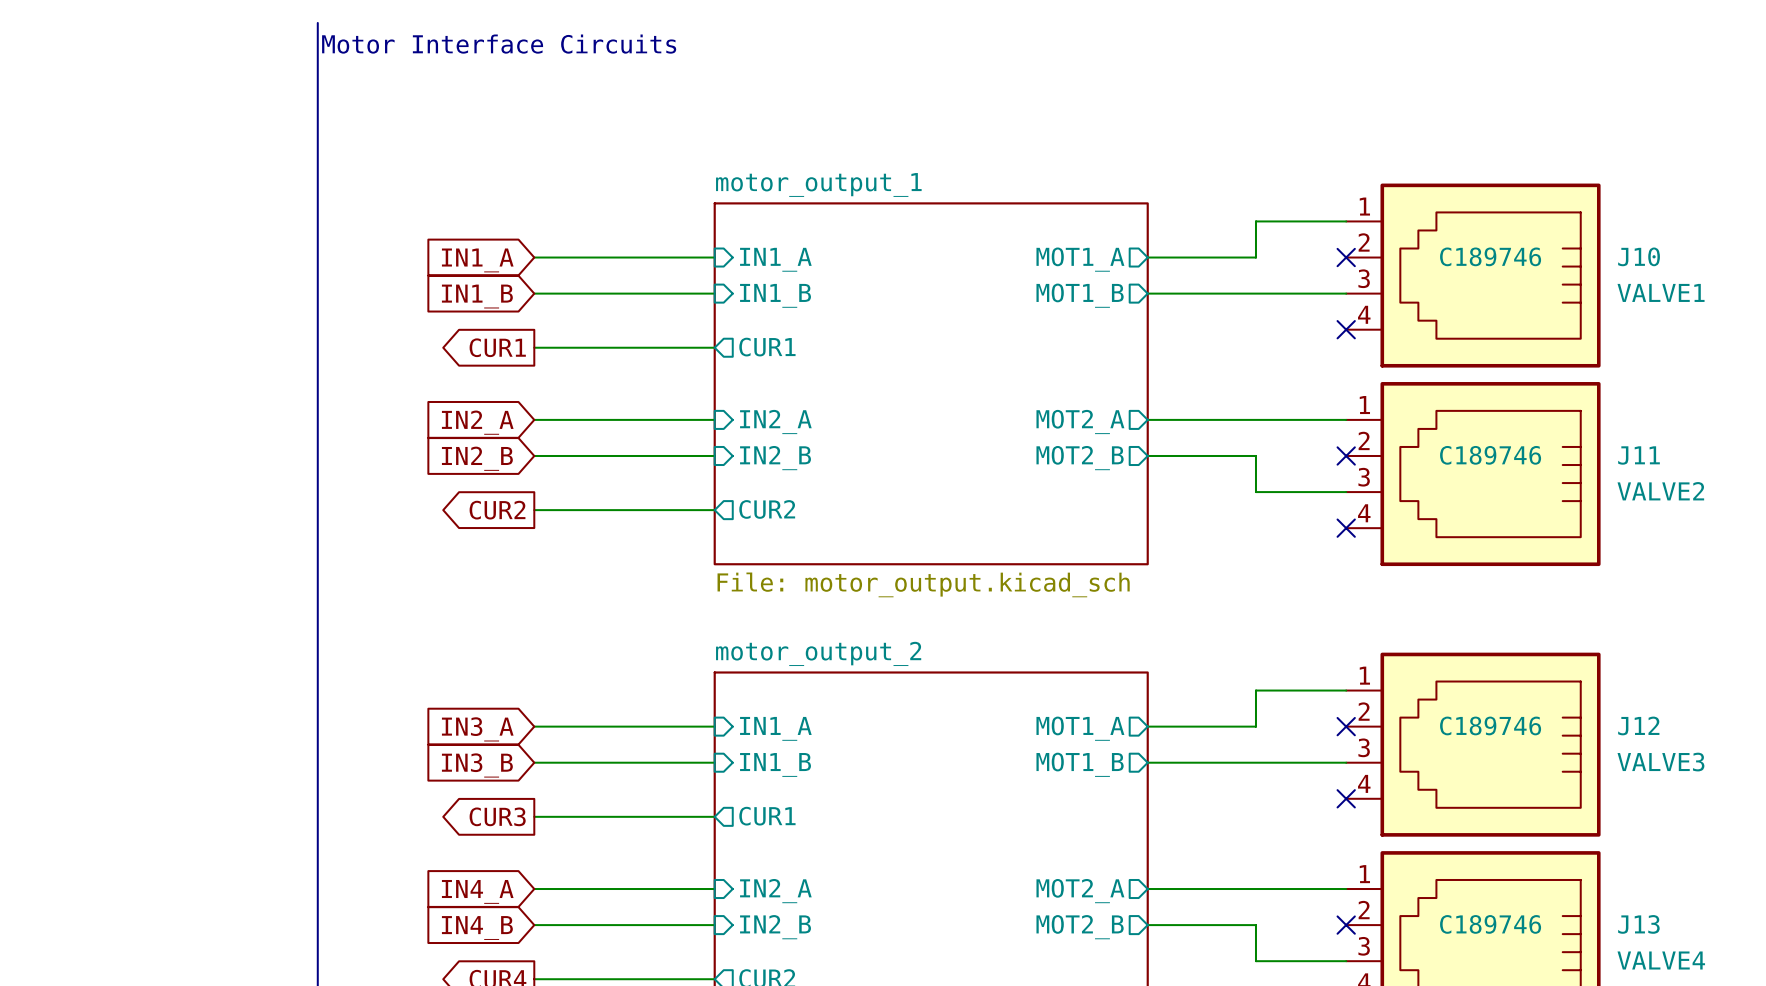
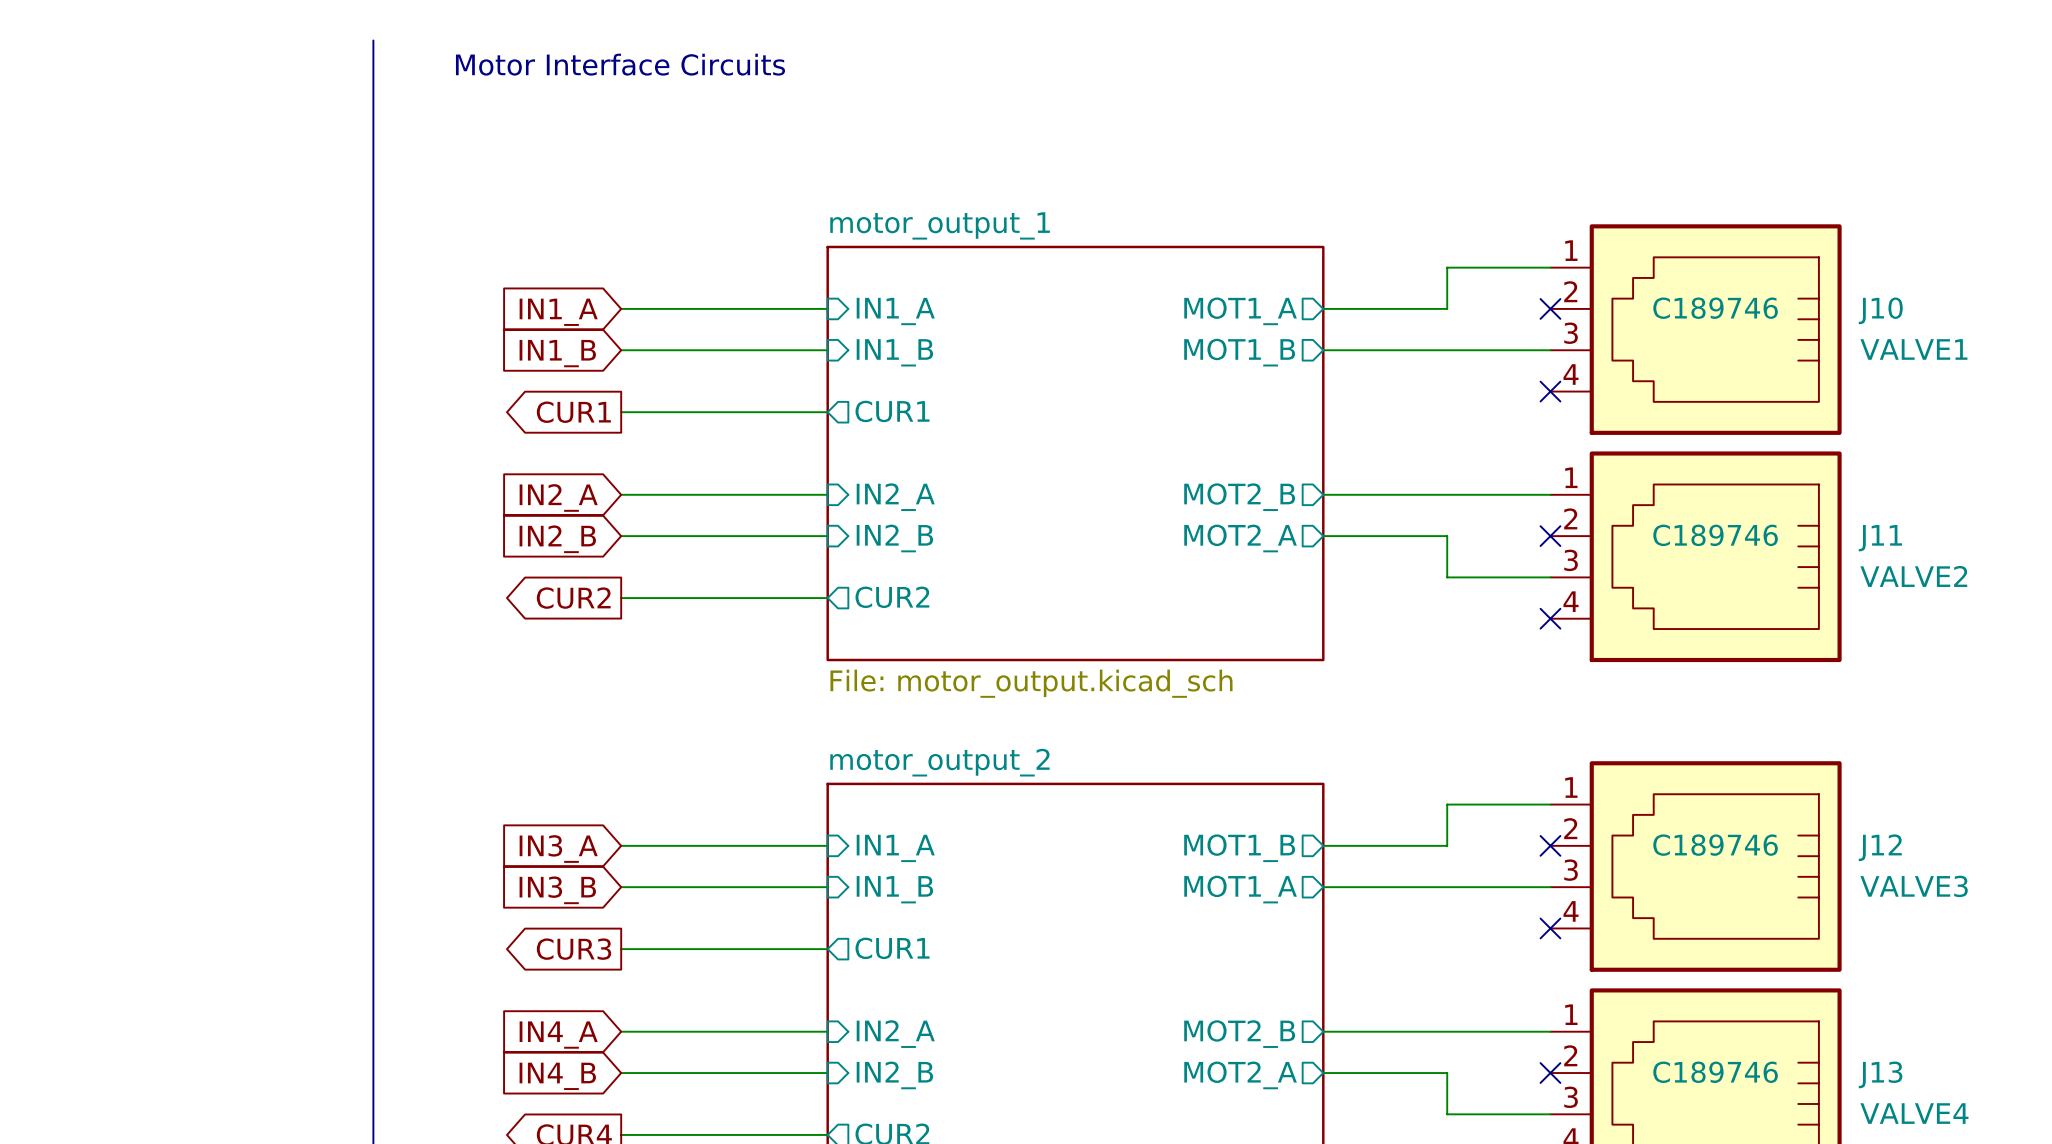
sheet pin: MOT2_A (1080, 421) -> MOT2_B (1239, 497)
sheet pin: MOT2_B (1080, 458) -> MOT2_A (1240, 538)
sheet pin: MOT1_A (1080, 728) -> MOT1_B (1239, 848)
sheet pin: MOT1_B (1080, 764) -> MOT1_A (1240, 889)
sheet pin: MOT2_A (1080, 891) -> MOT2_B (1239, 1034)
sheet pin: MOT2_B (1080, 927) -> MOT2_A (1240, 1075)

